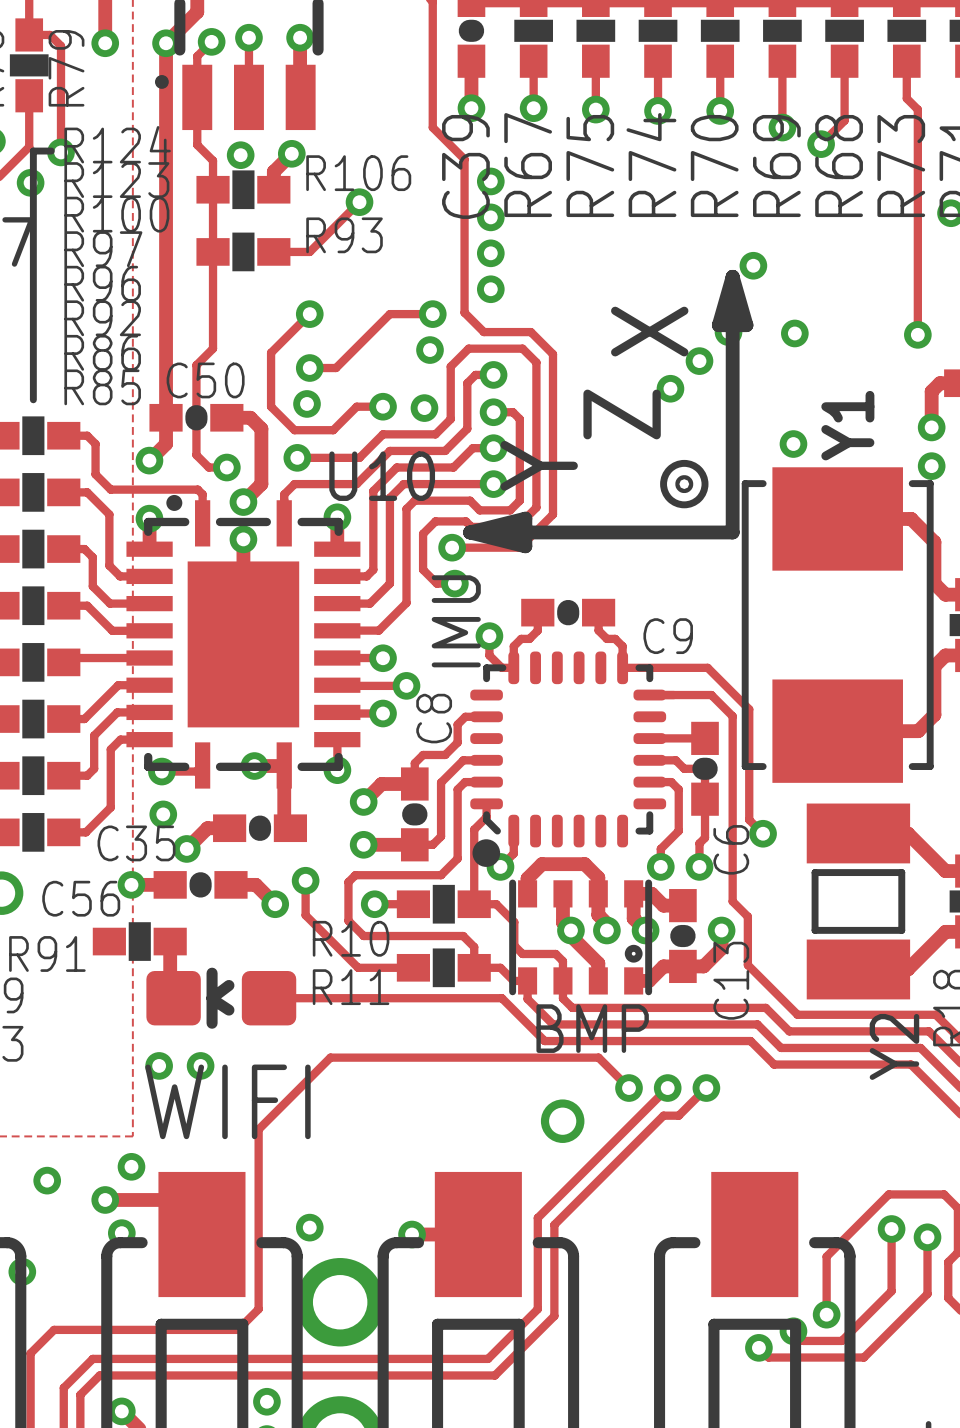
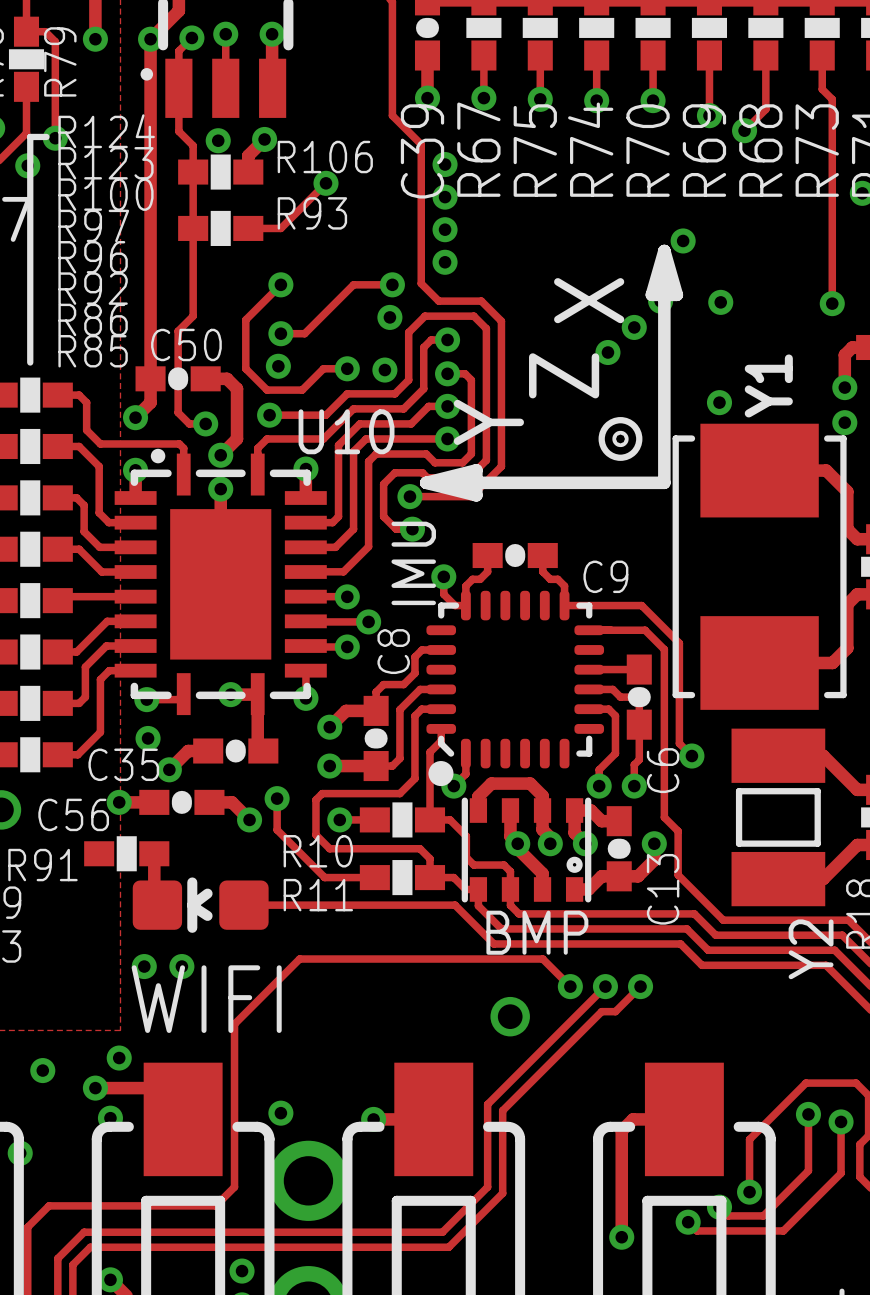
track: none -> (684, 1119) (633, 1119) (621, 1130) (621, 1237)
via: none -> (621, 1237)

